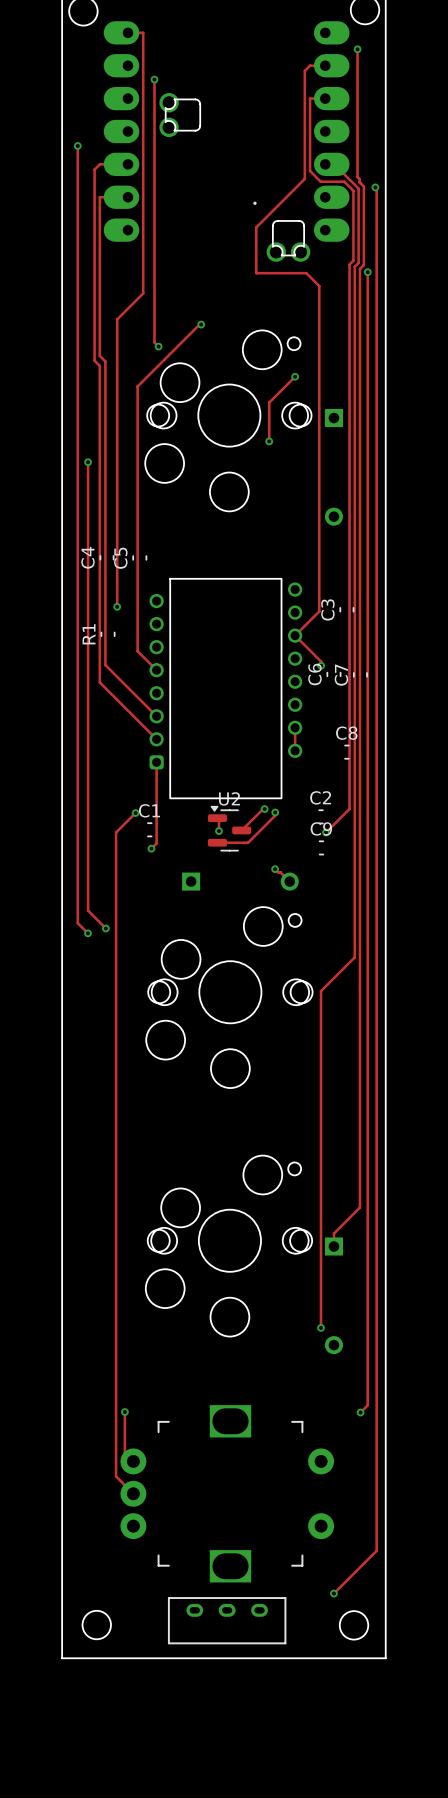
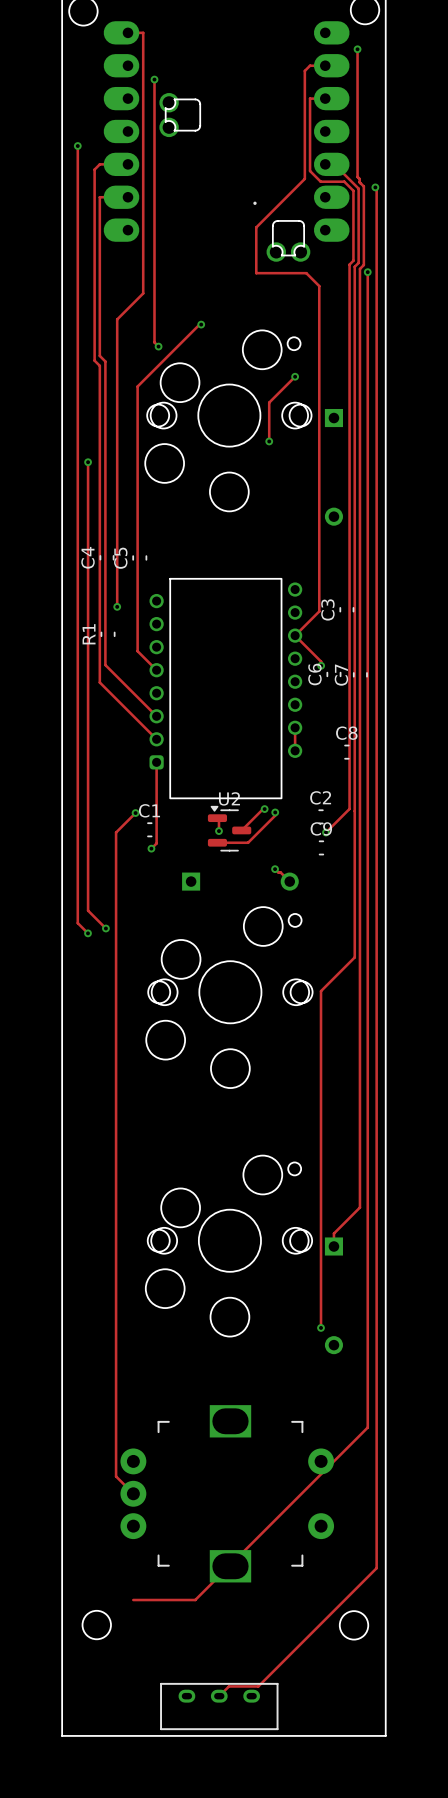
track: (367, 1405) (360, 1412) -> (367, 1405) (367, 1427) (195, 1600) (133, 1600)
track: (124, 1412) (124, 1452) (133, 1461) -> none
via: (124, 1412) -> none
via: (360, 1412) -> none
track: (376, 1550) (333, 1593) -> (376, 1550) (376, 1568) (258, 1686) (228, 1686) (219, 1696)
via: (333, 1593) -> none
part position: (227, 1620) -> (219, 1706)
board edge: (62, 1658) (385, 1658) -> (62, 1658) (62, 1735) (385, 1735) (385, 1658)

